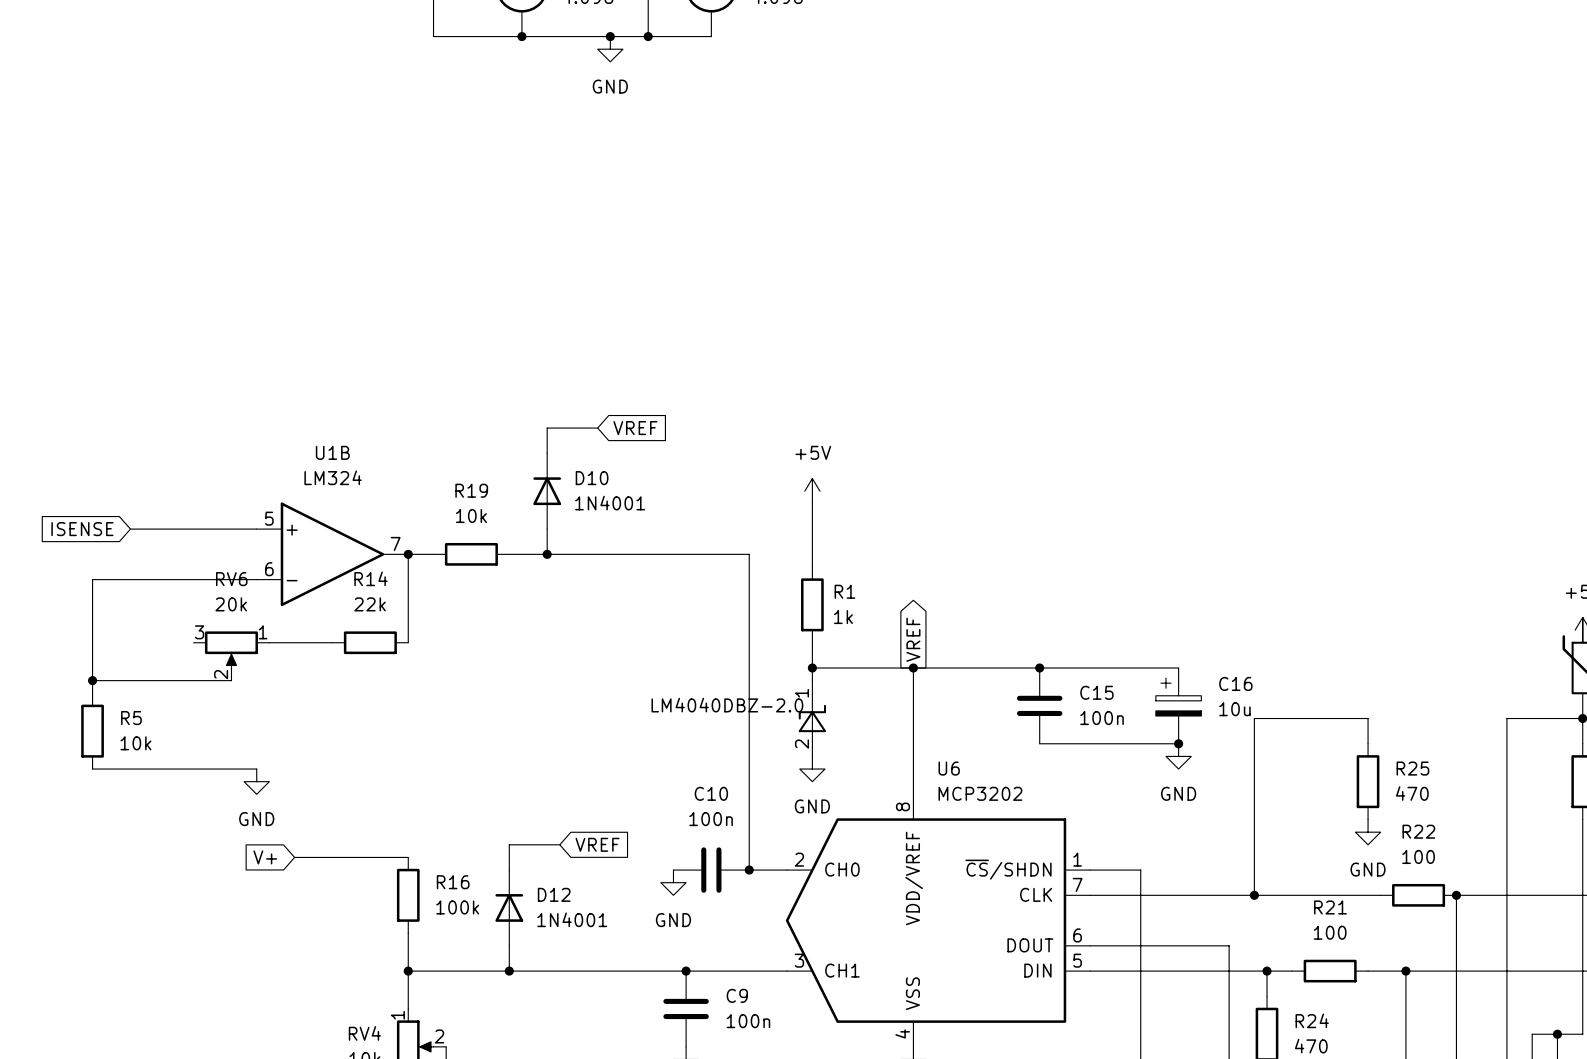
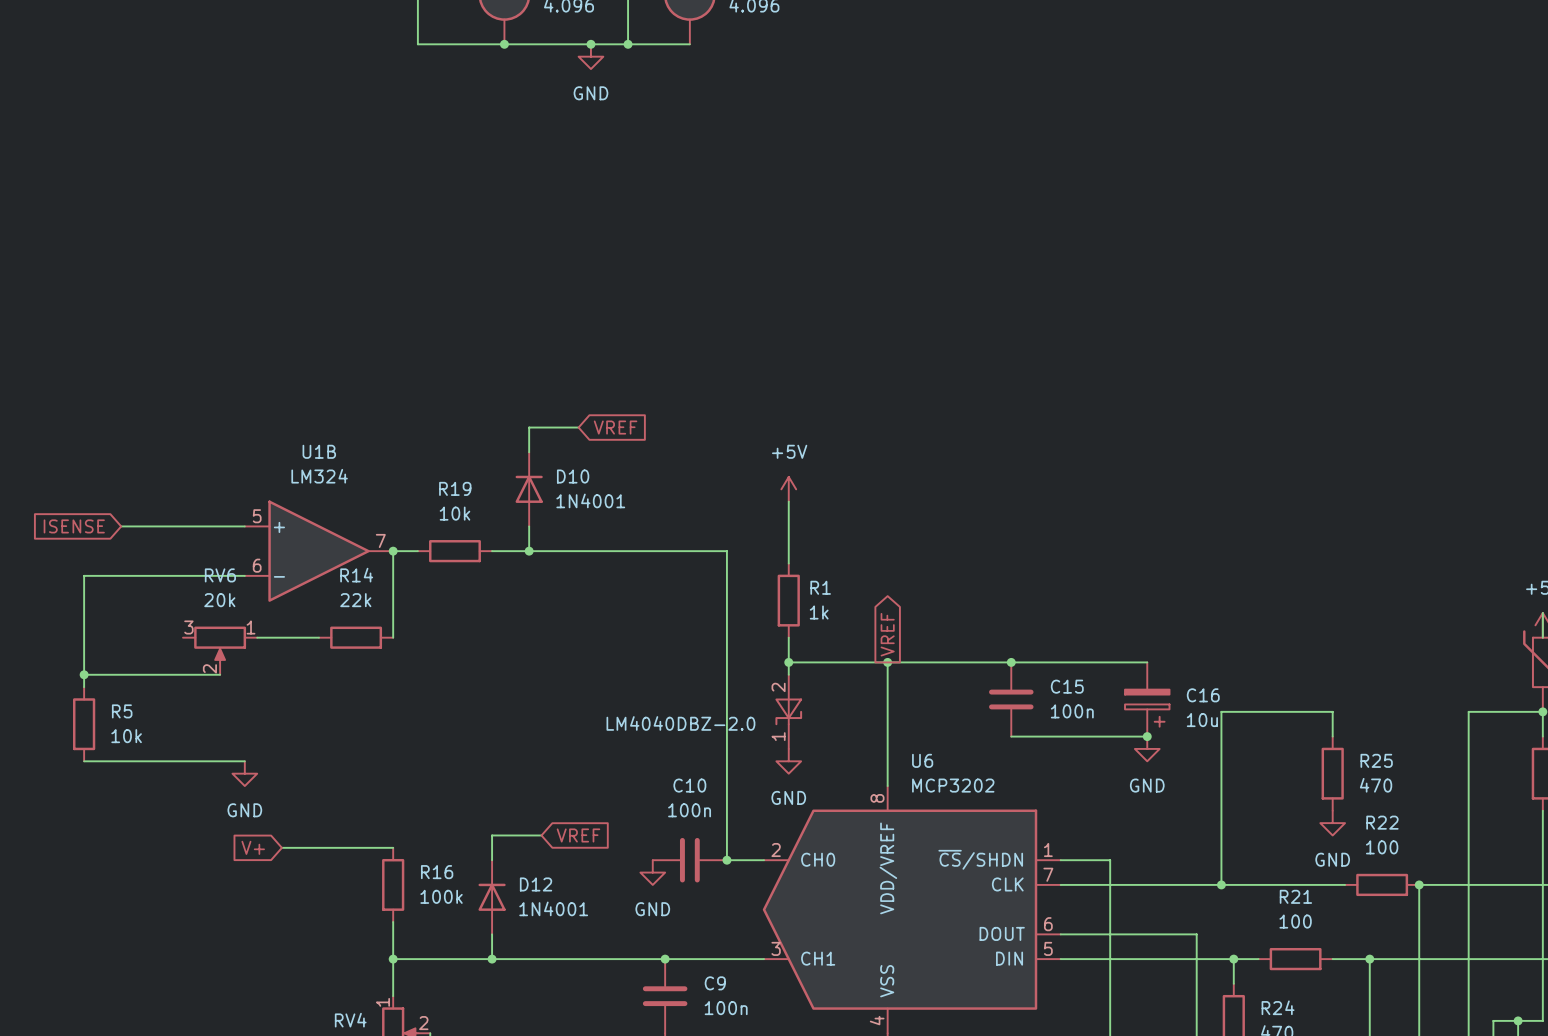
C16 rotation: 0° (1178, 697) -> 180° (1147, 708)
part value position: LM4040DBZ-2.0 (727, 705) -> LM4040DBZ-2.0 (680, 723)
part rotation: 0° (812, 718) -> 180° (788, 711)

